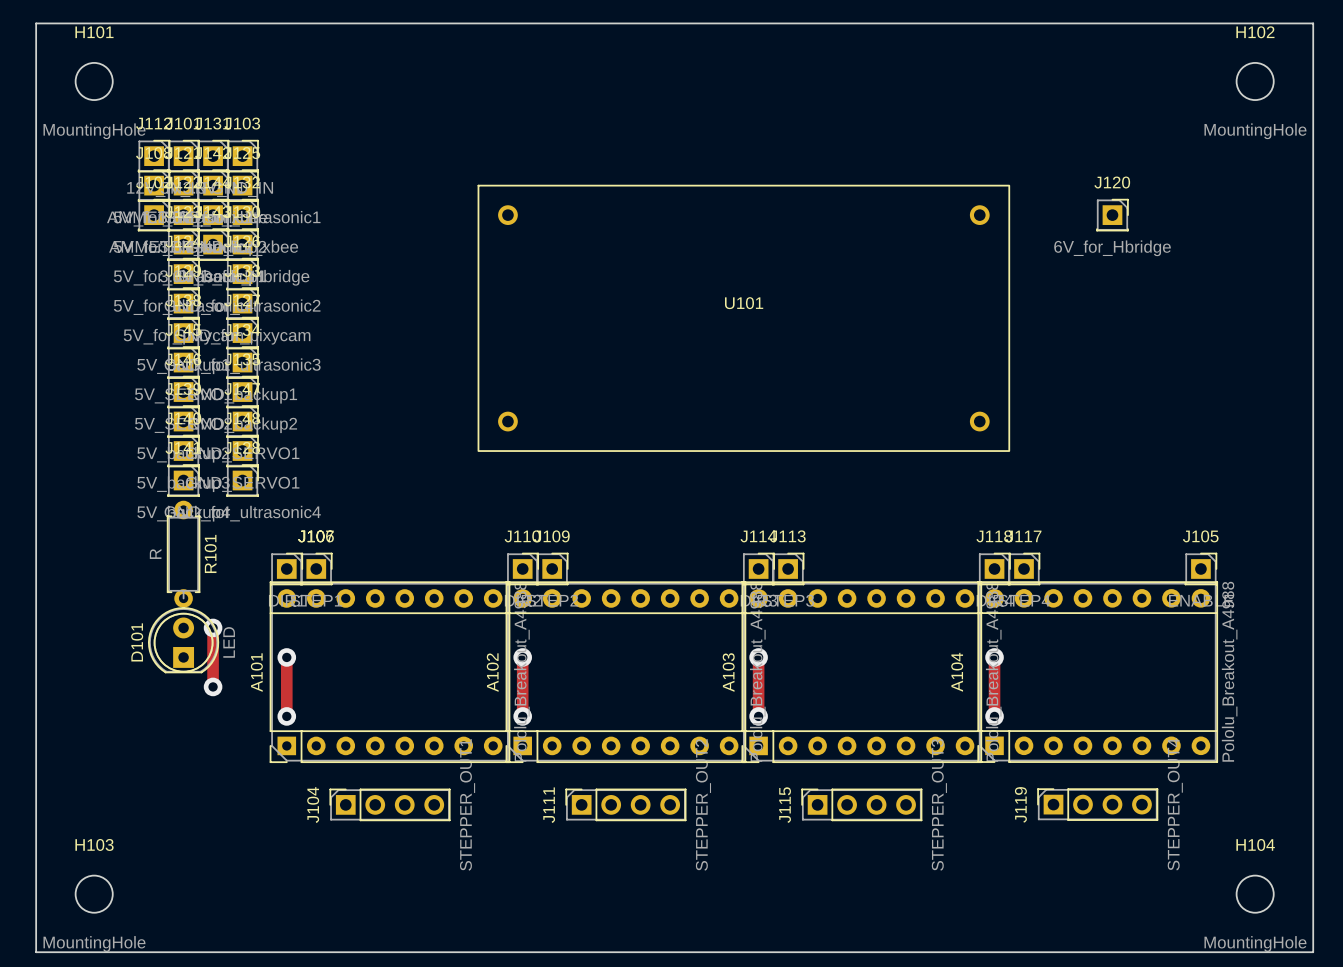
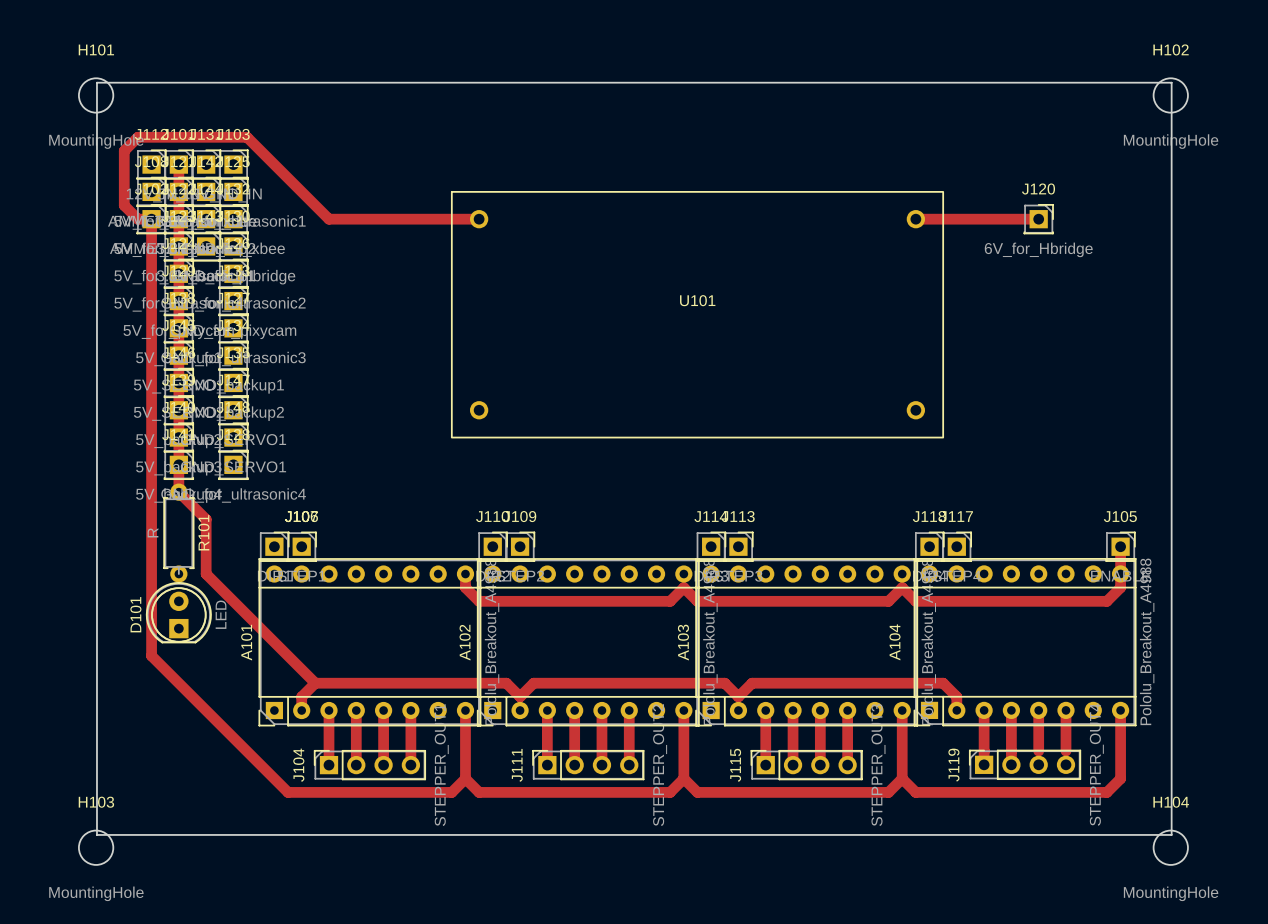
board edge: (36, 23) (1313, 23) (1313, 952) (36, 952) (36, 23) -> (96, 82) (96, 834) (1171, 834) (1171, 82) (96, 82)
track: none -> (178, 164) (178, 492) (206, 519) (206, 574) (315, 683)
track: none -> (479, 219) (329, 219) (247, 137) (137, 137) (124, 150) (124, 205) (137, 219) (151, 219) (151, 655) (288, 792) (451, 792) (465, 778)
track: none -> (915, 219) (1038, 219)
track: none -> (1120, 546) (1120, 587) (1106, 601) (915, 601) (902, 587) (888, 601) (697, 601) (683, 587) (670, 601) (479, 601) (465, 587) (465, 574)
track: (213, 627) (213, 686) -> (356, 710) (356, 765)
via: (213, 627) -> none
track: (286, 657) (286, 716) -> (329, 710) (329, 765)
via: (286, 657) -> none
track: (522, 657) (522, 716) -> (547, 710) (547, 765)
via: (522, 657) -> none
track: (758, 657) (758, 716) -> (765, 710) (765, 765)
via: (758, 657) -> none
track: (994, 657) (994, 716) -> (847, 710) (847, 765)
via: (994, 657) -> none
via: (213, 686) -> none
via: (286, 716) -> none
track: none -> (315, 683) (301, 696) (301, 710)
track: none -> (315, 683) (506, 683) (520, 696) (533, 683) (724, 683) (738, 696) (752, 683) (943, 683) (956, 696) (956, 710)
via: (522, 716) -> none
via: (758, 716) -> none
via: (994, 716) -> none
track: none -> (383, 710) (383, 765)
track: none -> (410, 710) (410, 765)
track: none -> (465, 710) (465, 778)
track: none -> (574, 710) (574, 765)
track: none -> (601, 710) (601, 765)
track: none -> (629, 710) (629, 765)
track: none -> (683, 710) (683, 778)
track: none -> (793, 710) (793, 765)
track: none -> (820, 710) (820, 765)
track: none -> (902, 710) (902, 778)
track: none -> (984, 710) (984, 751)
track: none -> (1011, 710) (1011, 764)
track: none -> (1038, 710) (1038, 751)
track: none -> (1066, 710) (1066, 751)
track: none -> (1120, 710) (1120, 778) (1106, 792) (915, 792) (902, 778)
track: none -> (465, 778) (479, 792) (670, 792) (683, 778)
track: none -> (683, 778) (697, 792) (888, 792) (902, 778)

